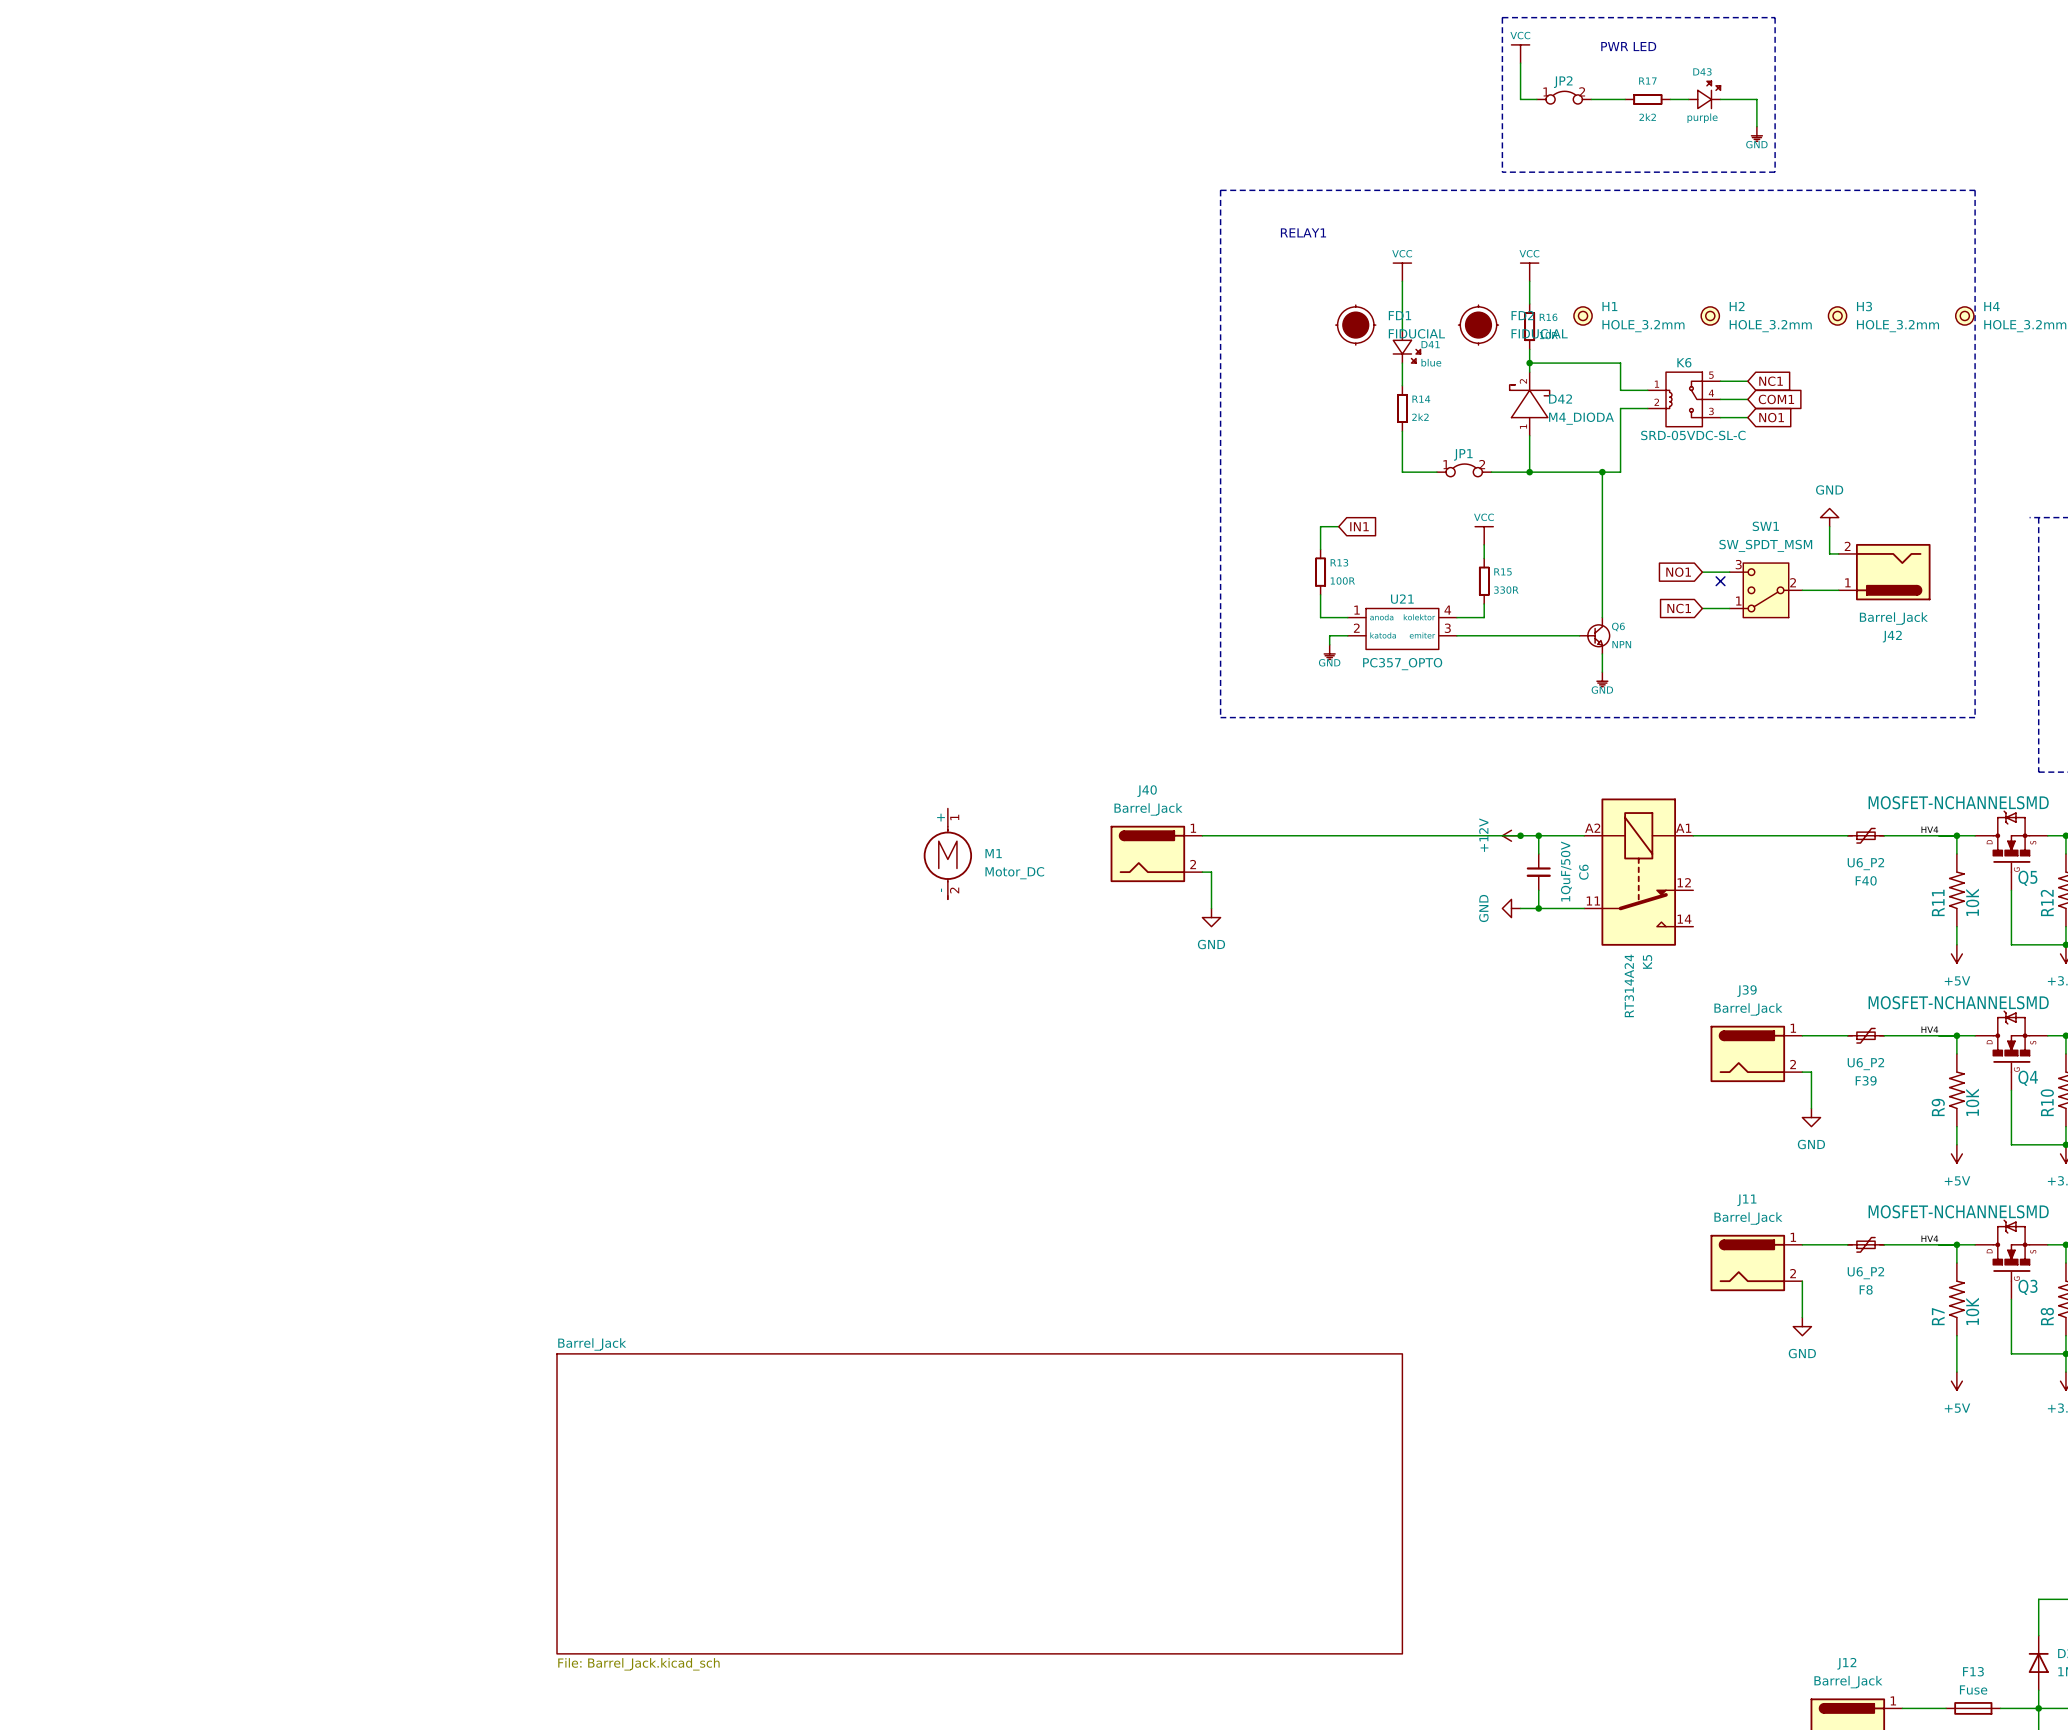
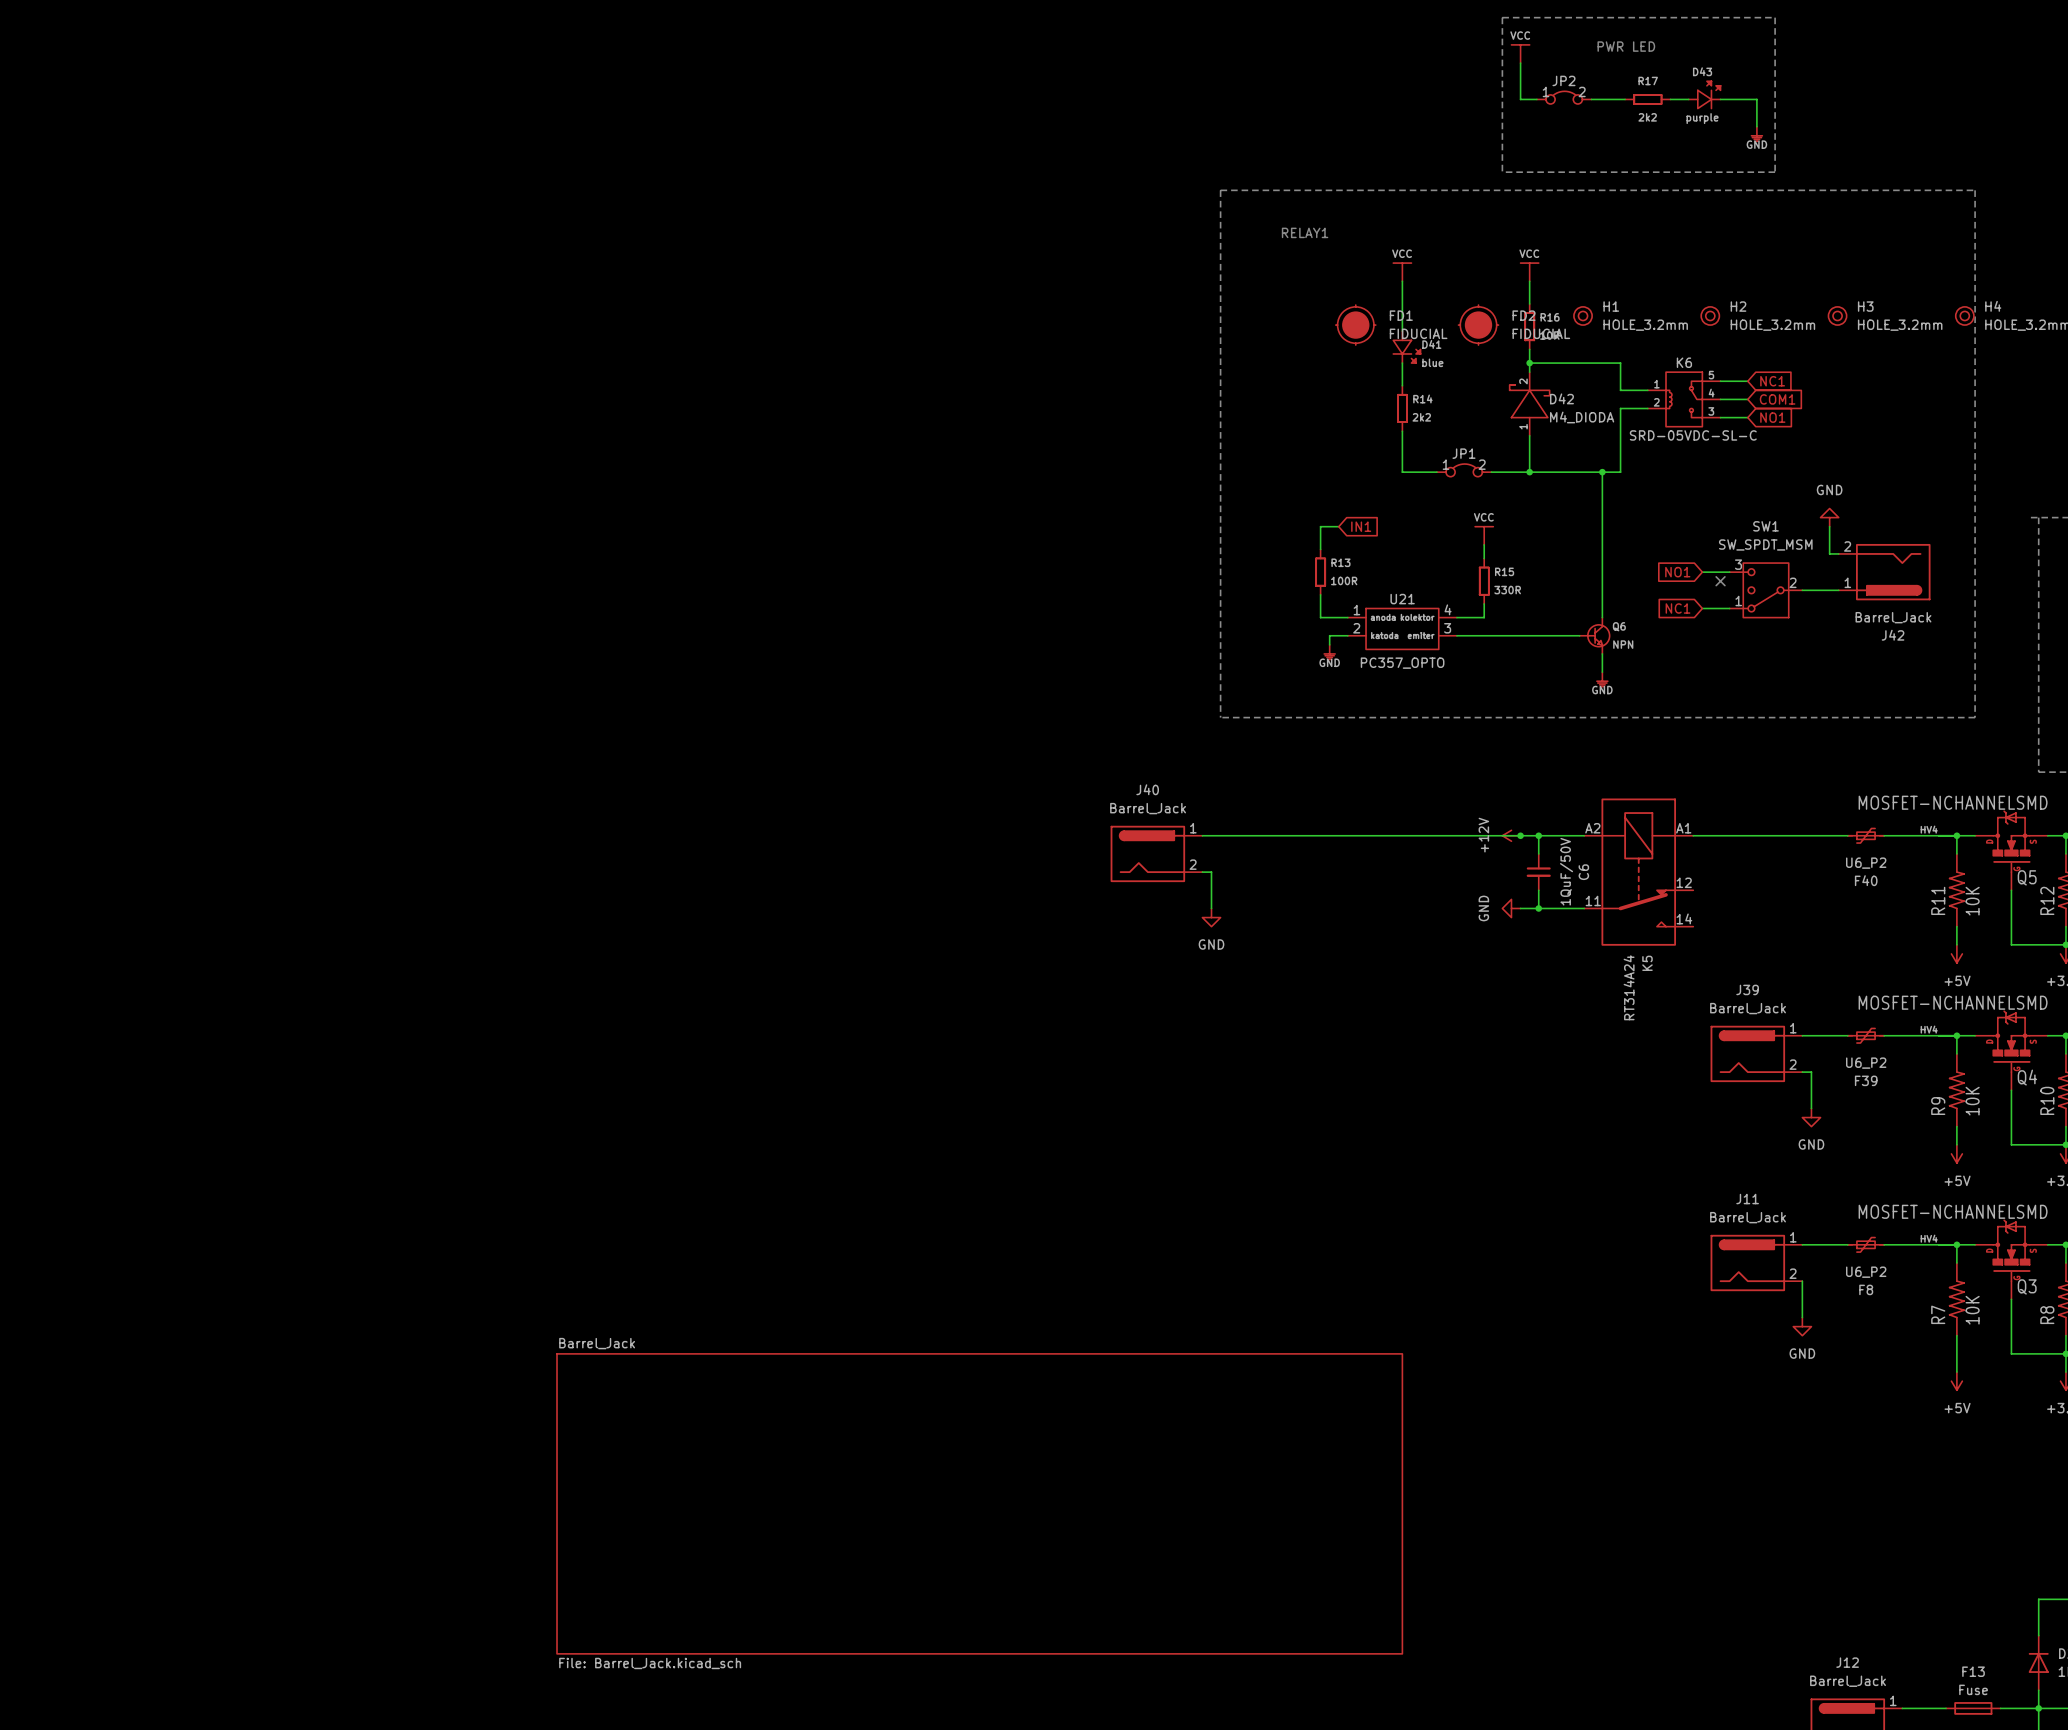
M1: Motor_DC (947, 853) -> none

